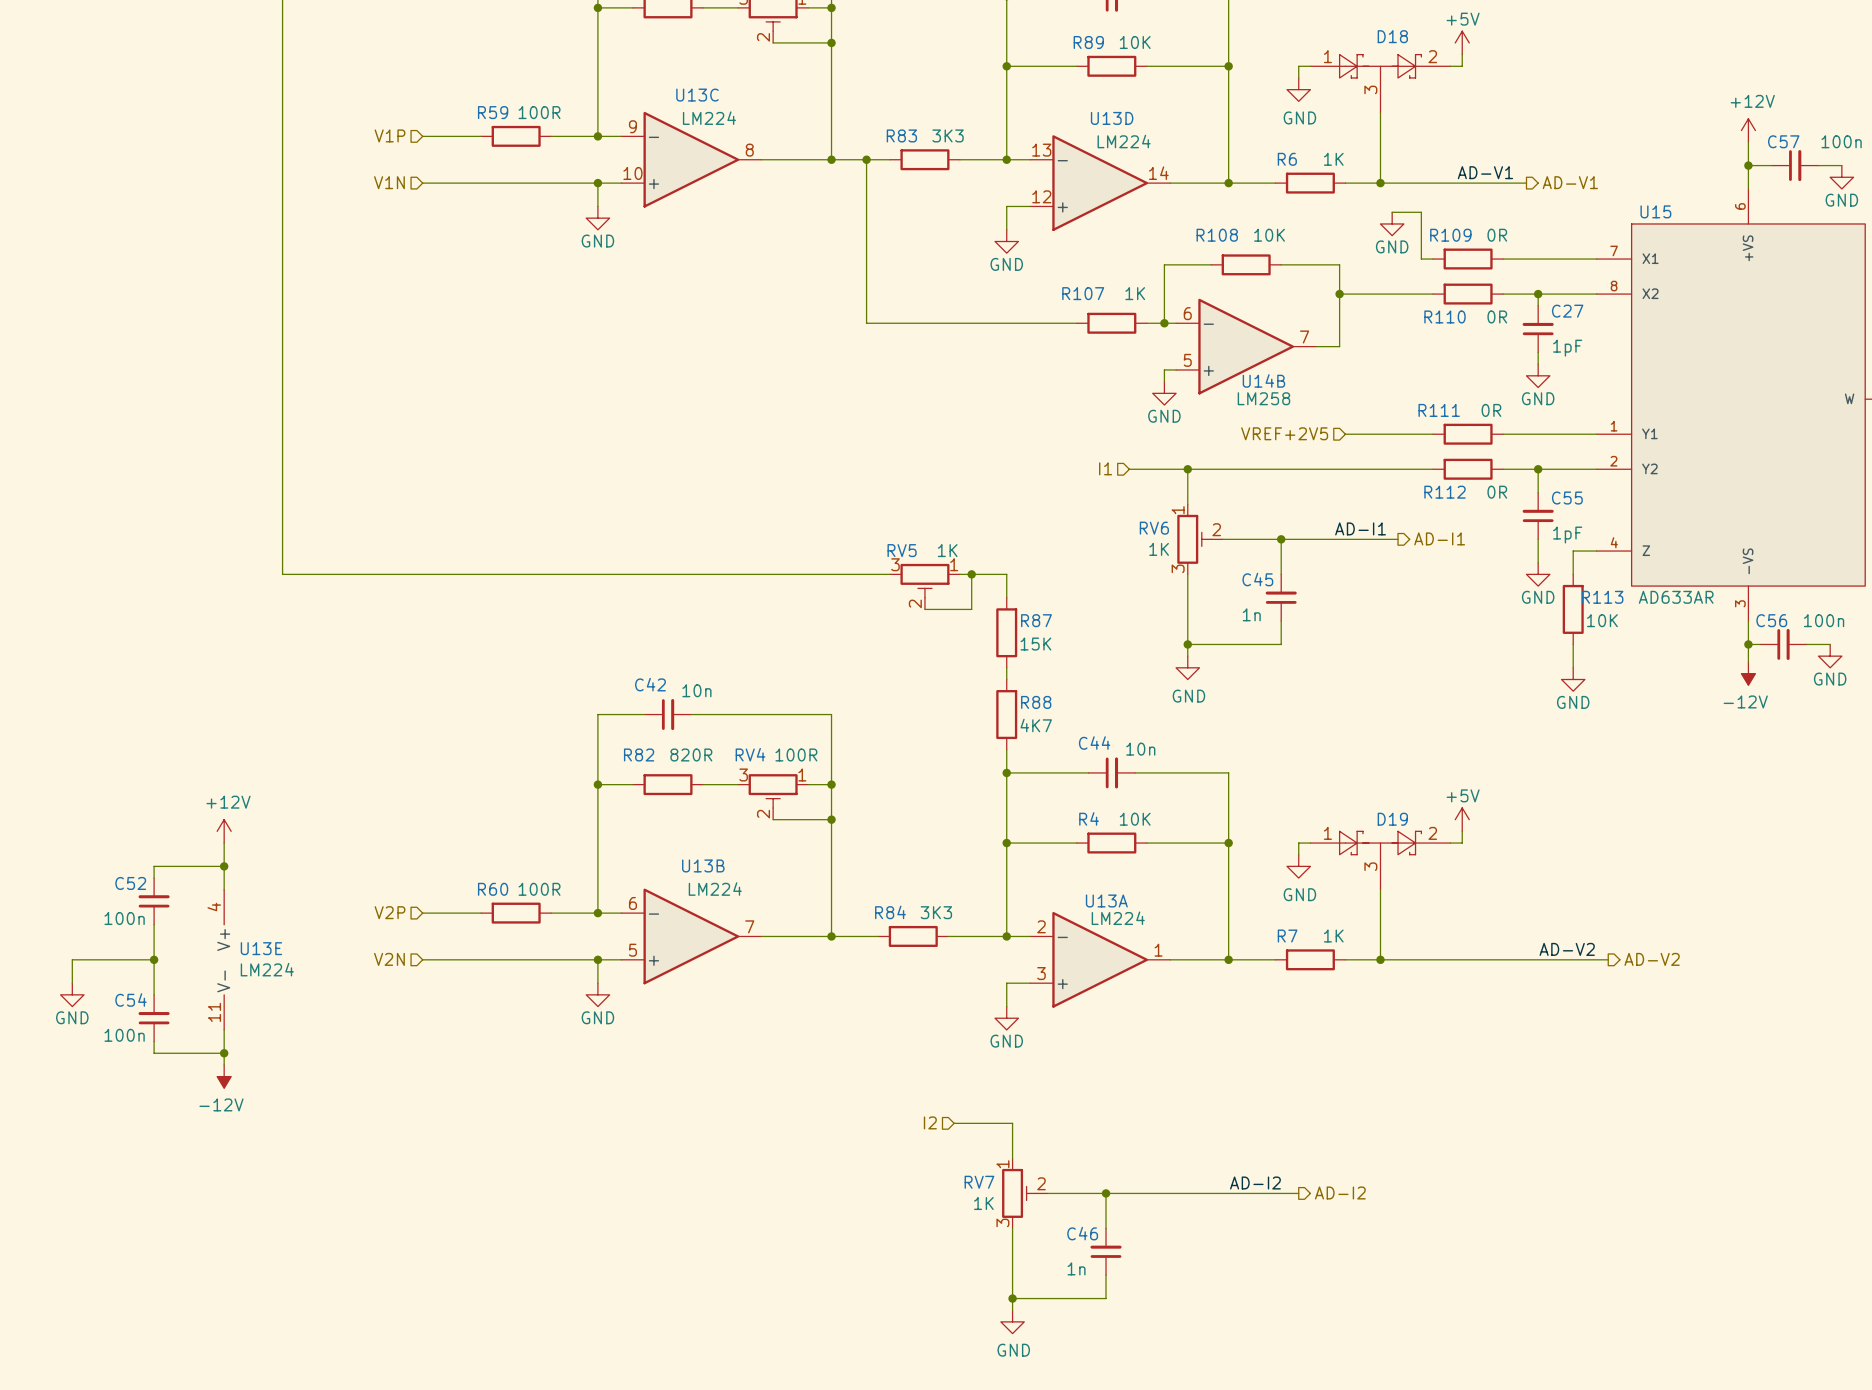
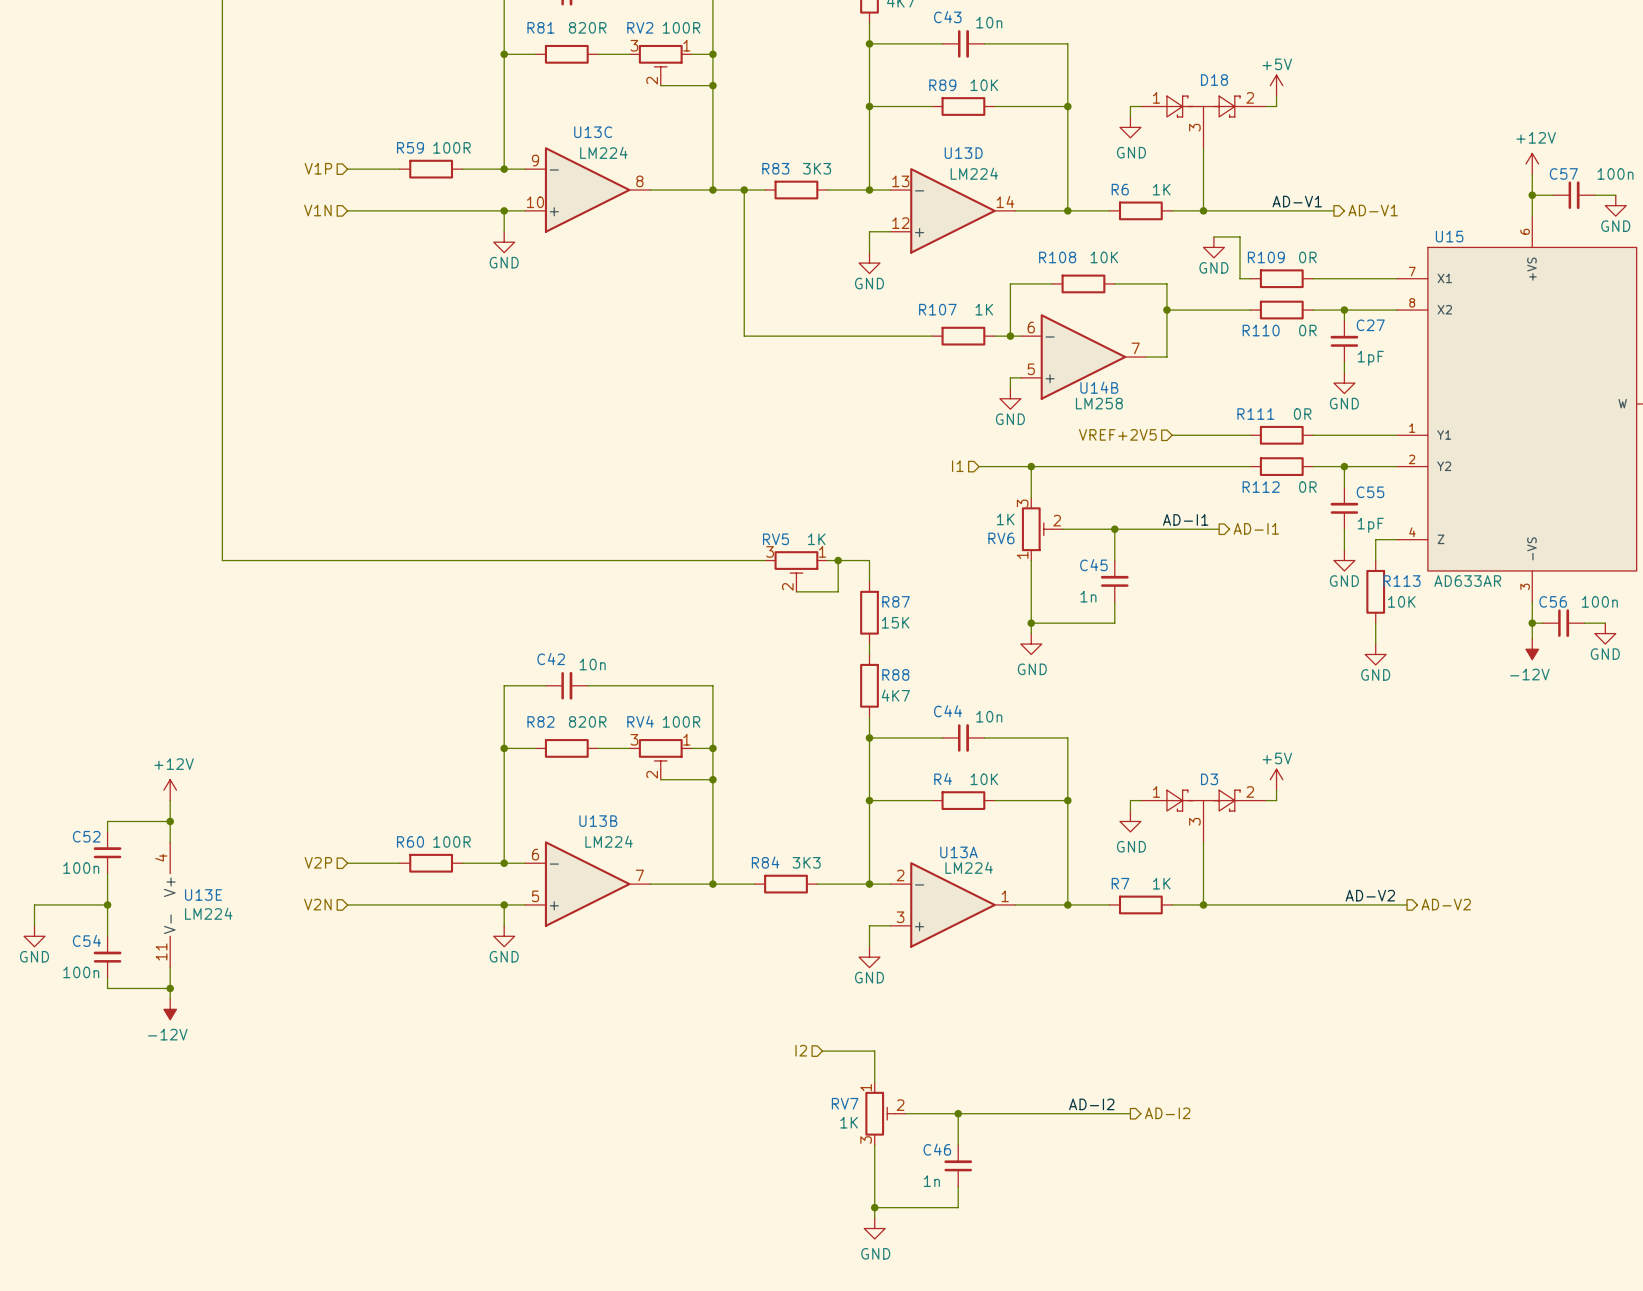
RV6 flip: as is (1194, 539) -> up-down (1037, 529)
D19 name: D19 (1392, 819) -> D3 (1209, 779)

